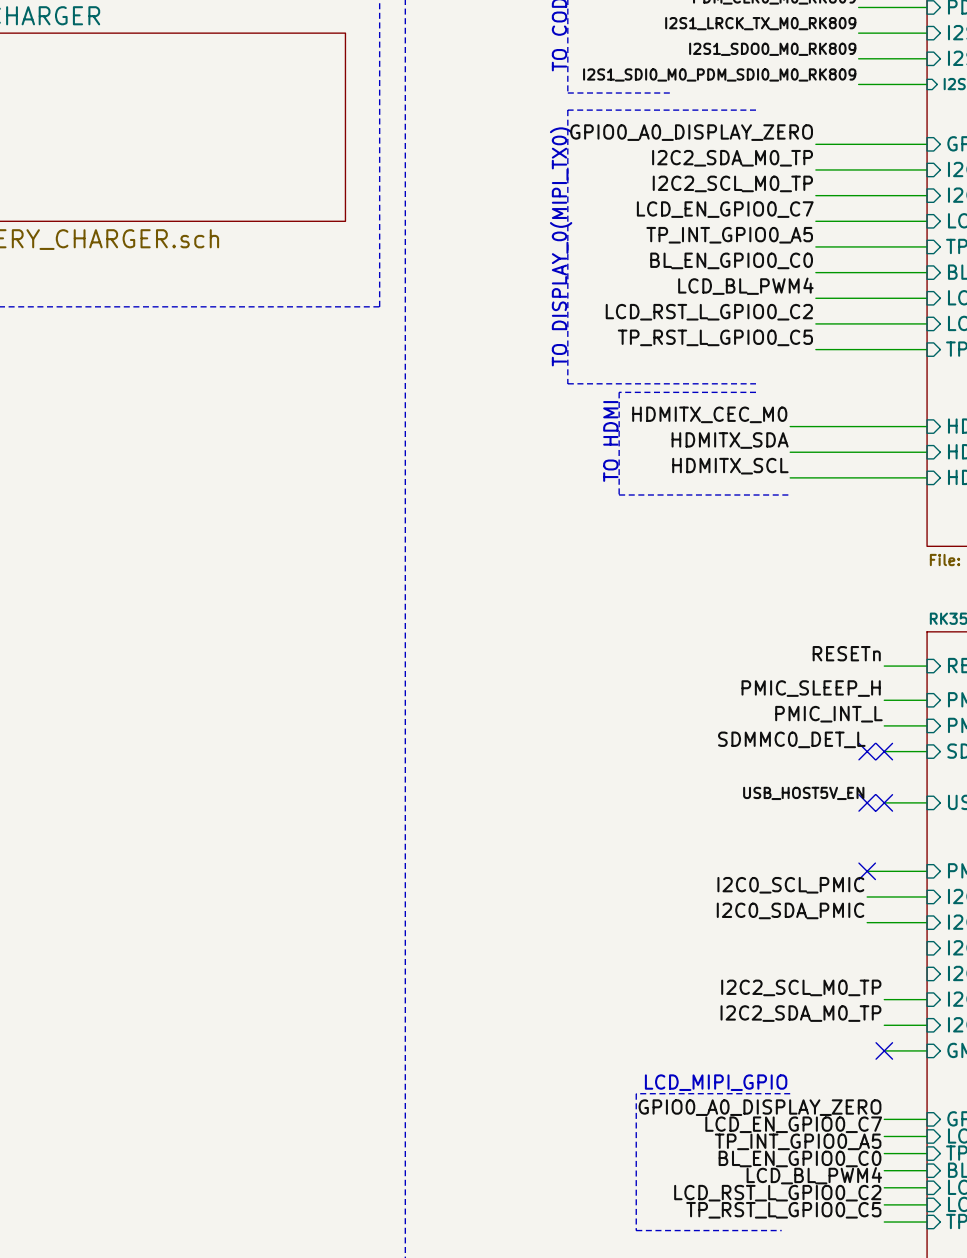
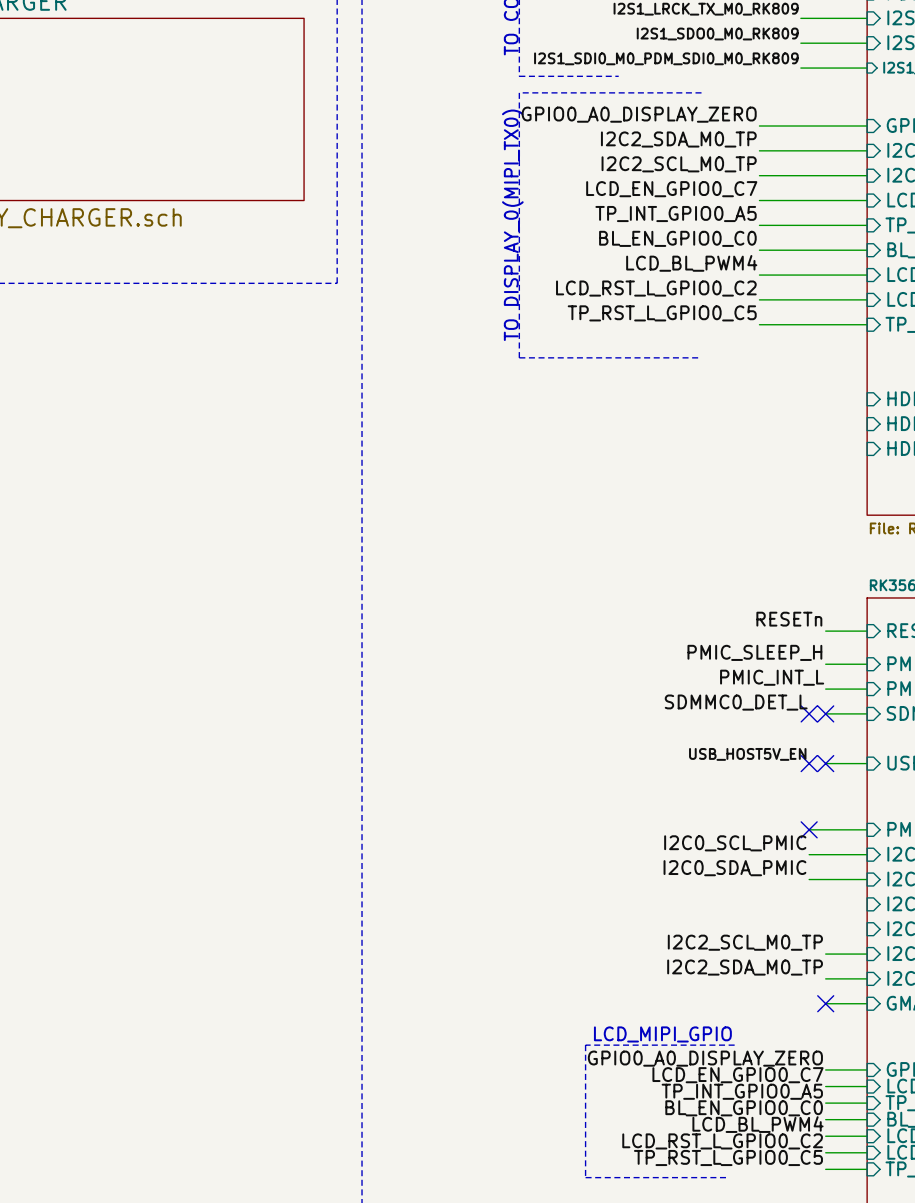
line: (755, 392) (619, 392) (619, 495) (790, 495) -> none
label: HDMITX_CEC_M0 (709, 414) -> none
wire: (790, 426) (927, 426) -> none
label: HDMITX_SDA (730, 440) -> none
text: TO HDMI (610, 441) -> none
wire: (790, 452) (927, 452) -> none
label: HDMITX_SCL (730, 466) -> none
wire: (790, 477) (927, 477) -> none

